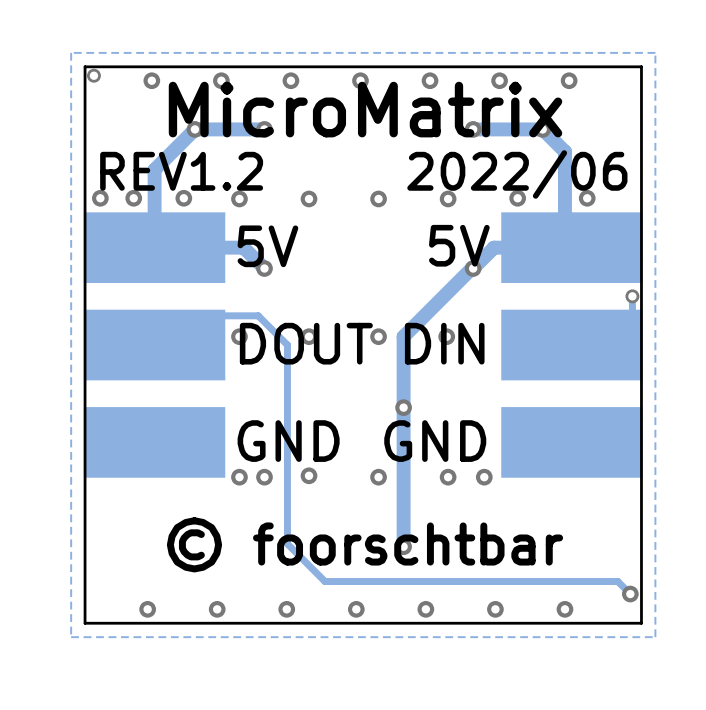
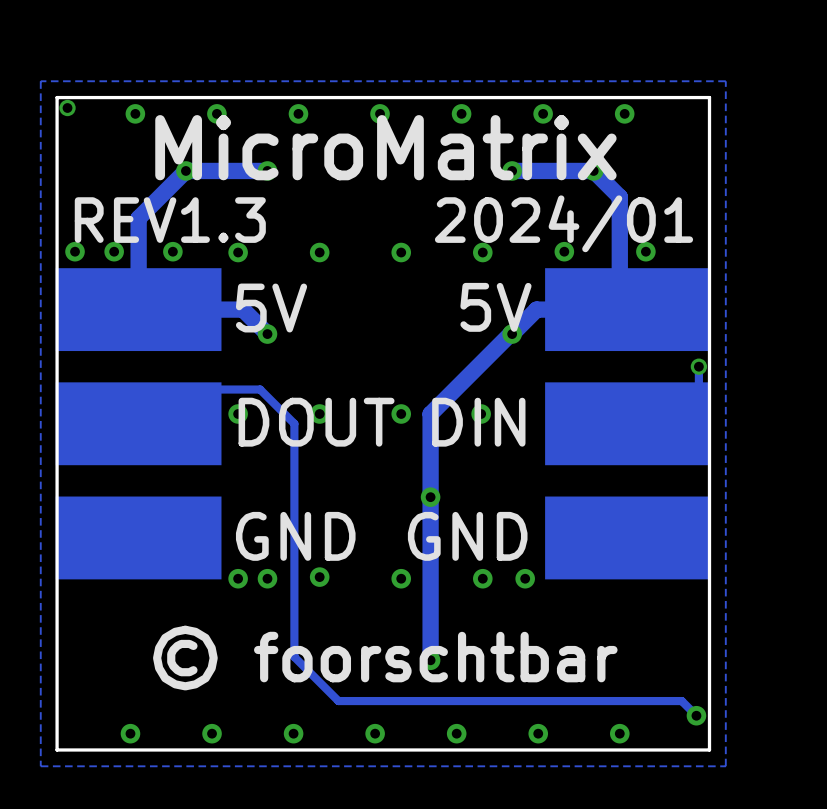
text: REV1.2 (181, 171) -> REV1.3 (170, 220)
text: 2022/06 (517, 174) -> 2024/01 (564, 223)

